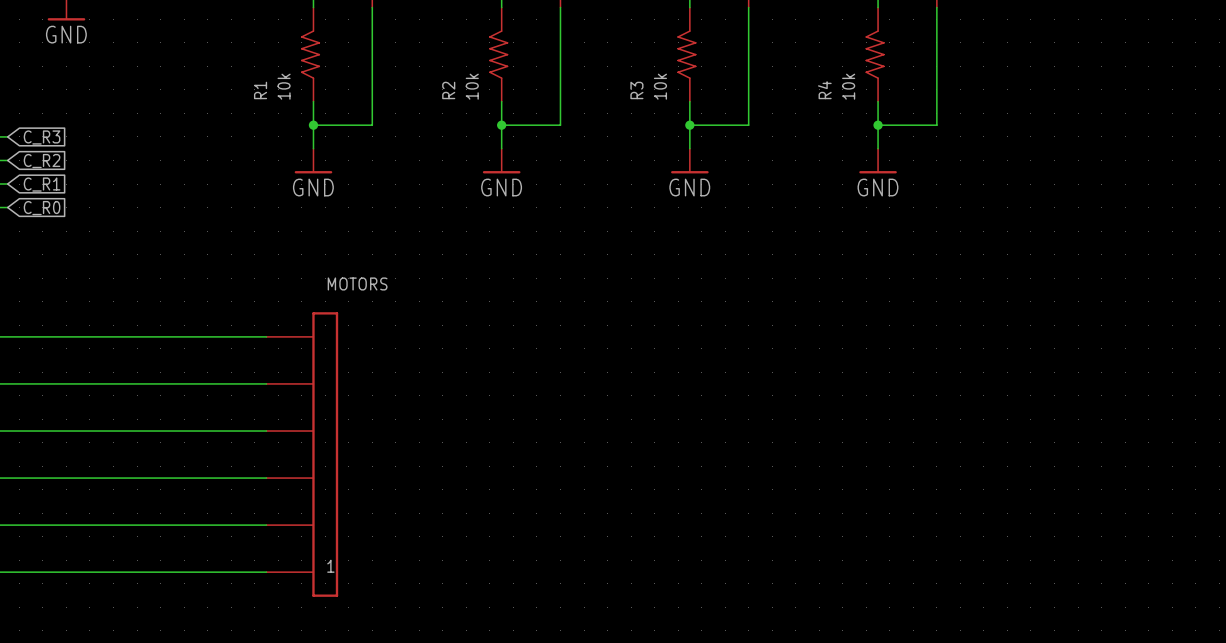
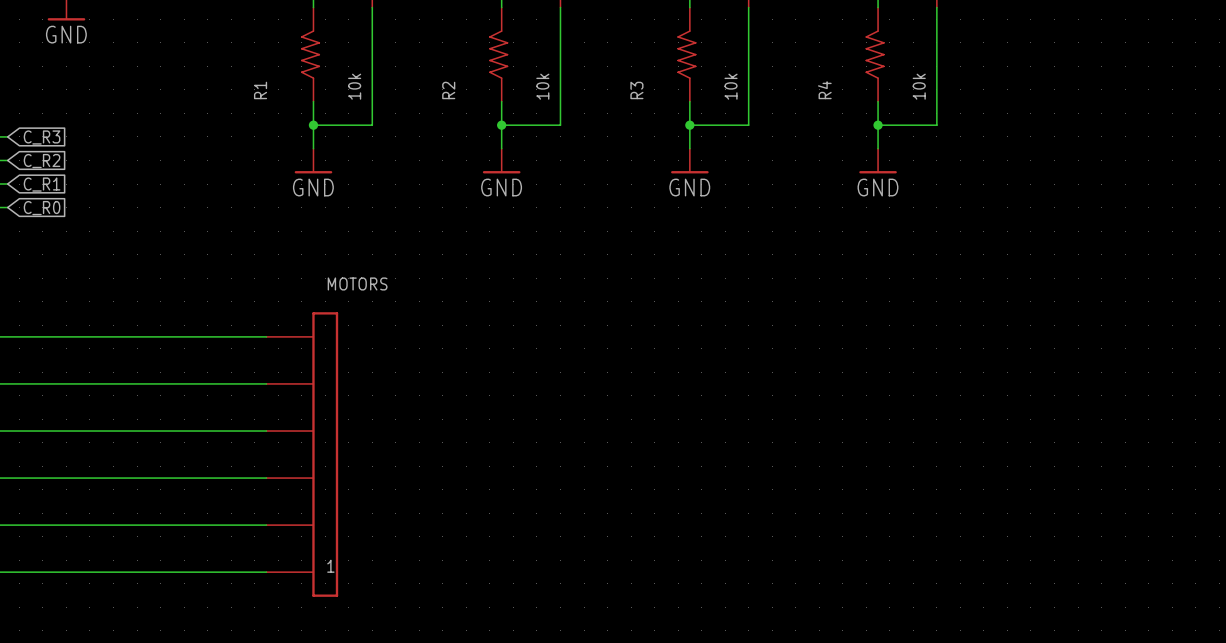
R1 value position: 10k (284, 86) -> 10k (354, 86)
R2 value position: 10k (472, 86) -> 10k (542, 86)
R3 value position: 10k (660, 86) -> 10k (731, 86)
R4 value position: 10k (848, 86) -> 10k (919, 86)

